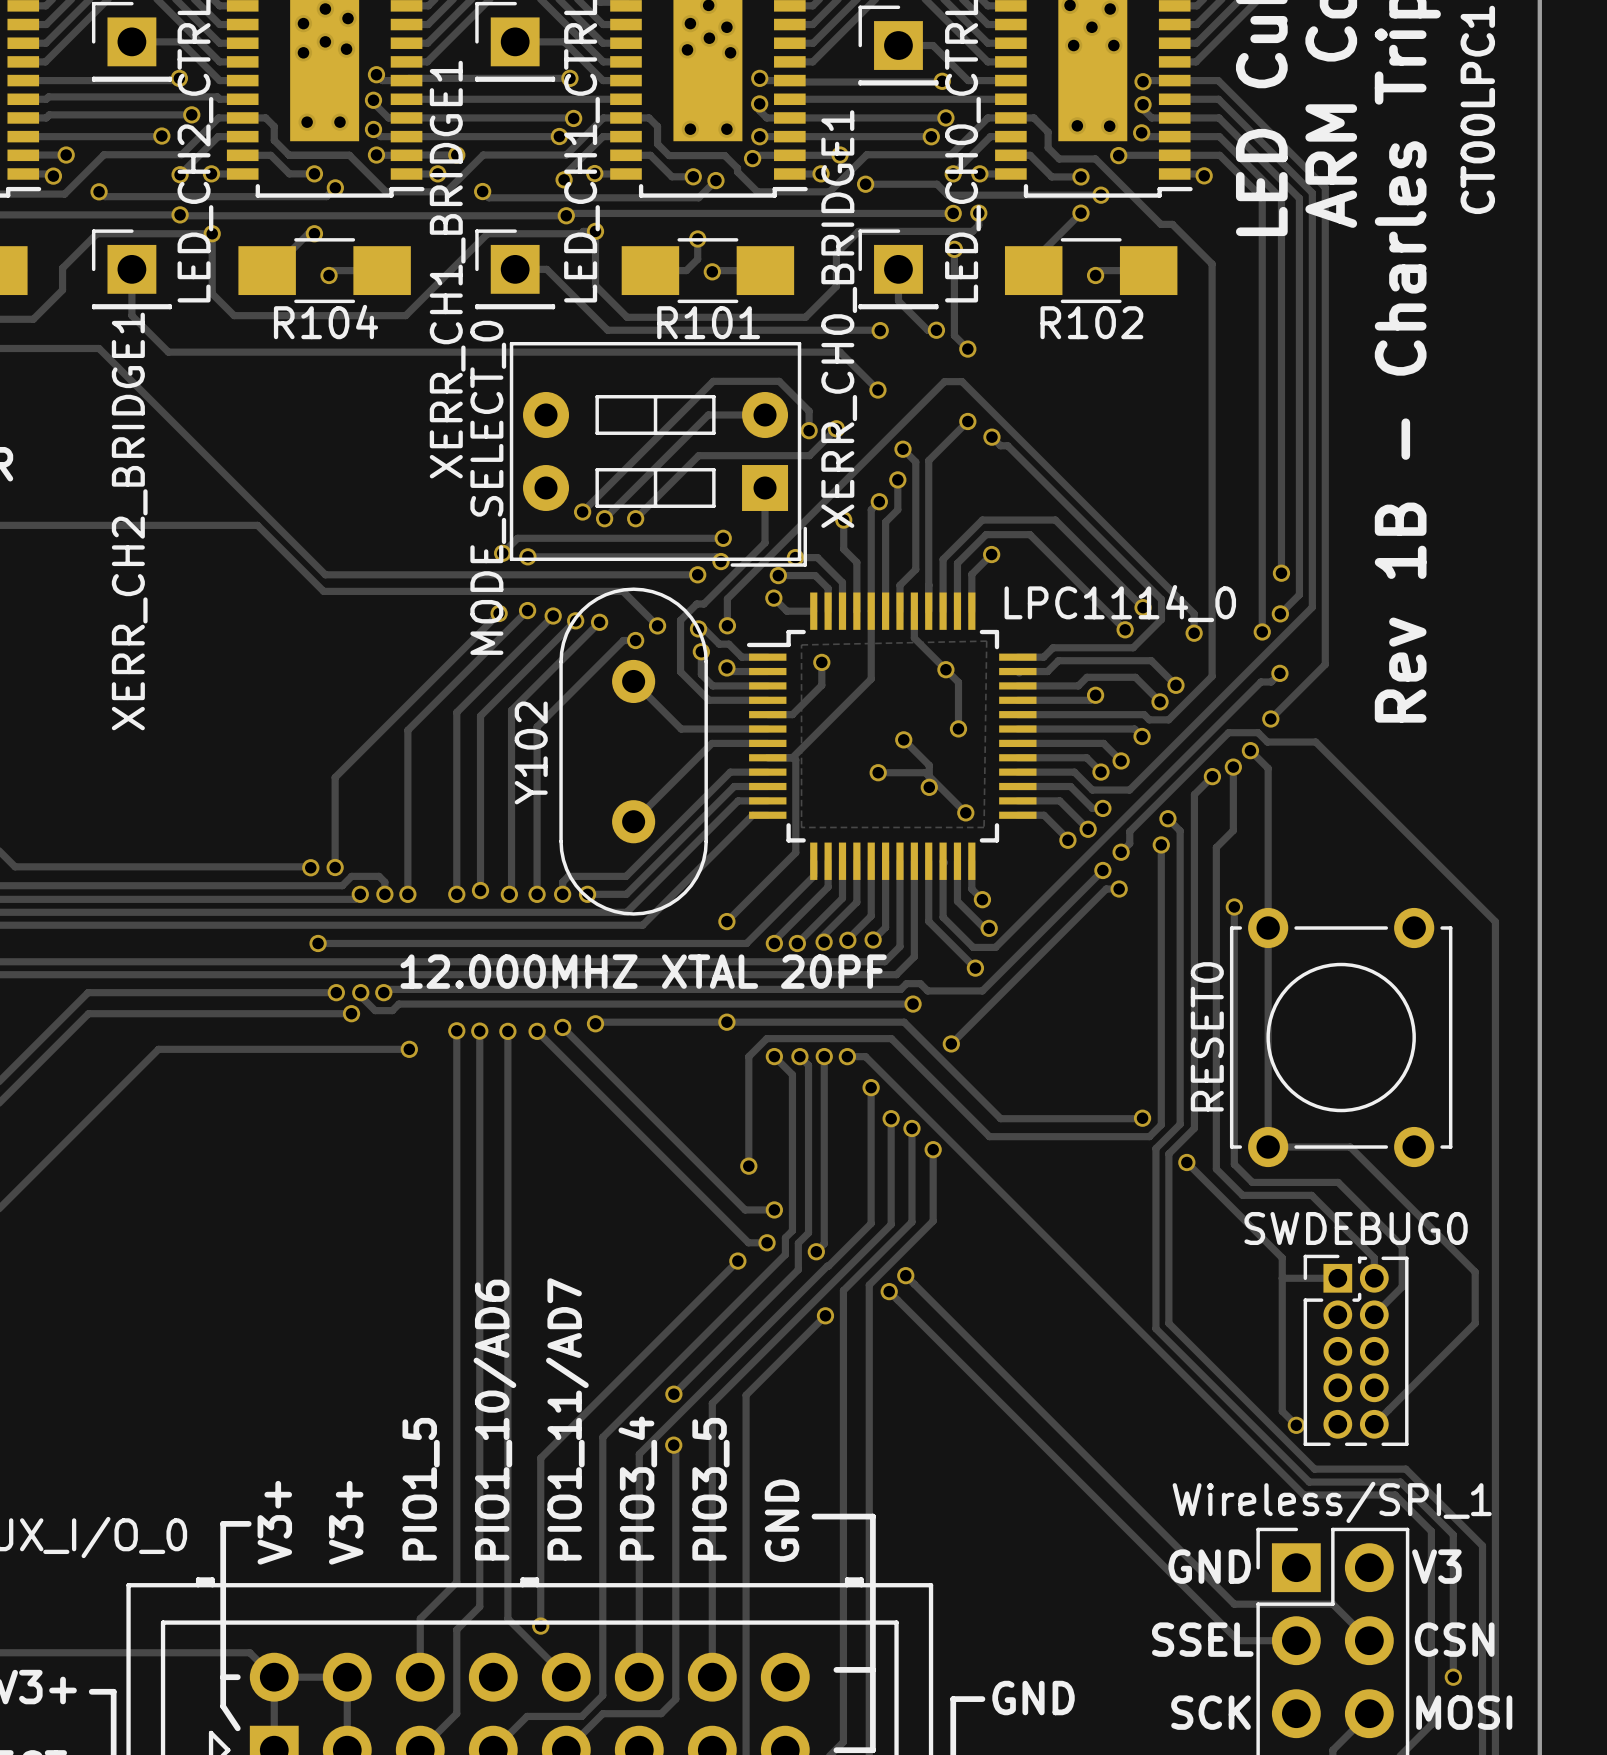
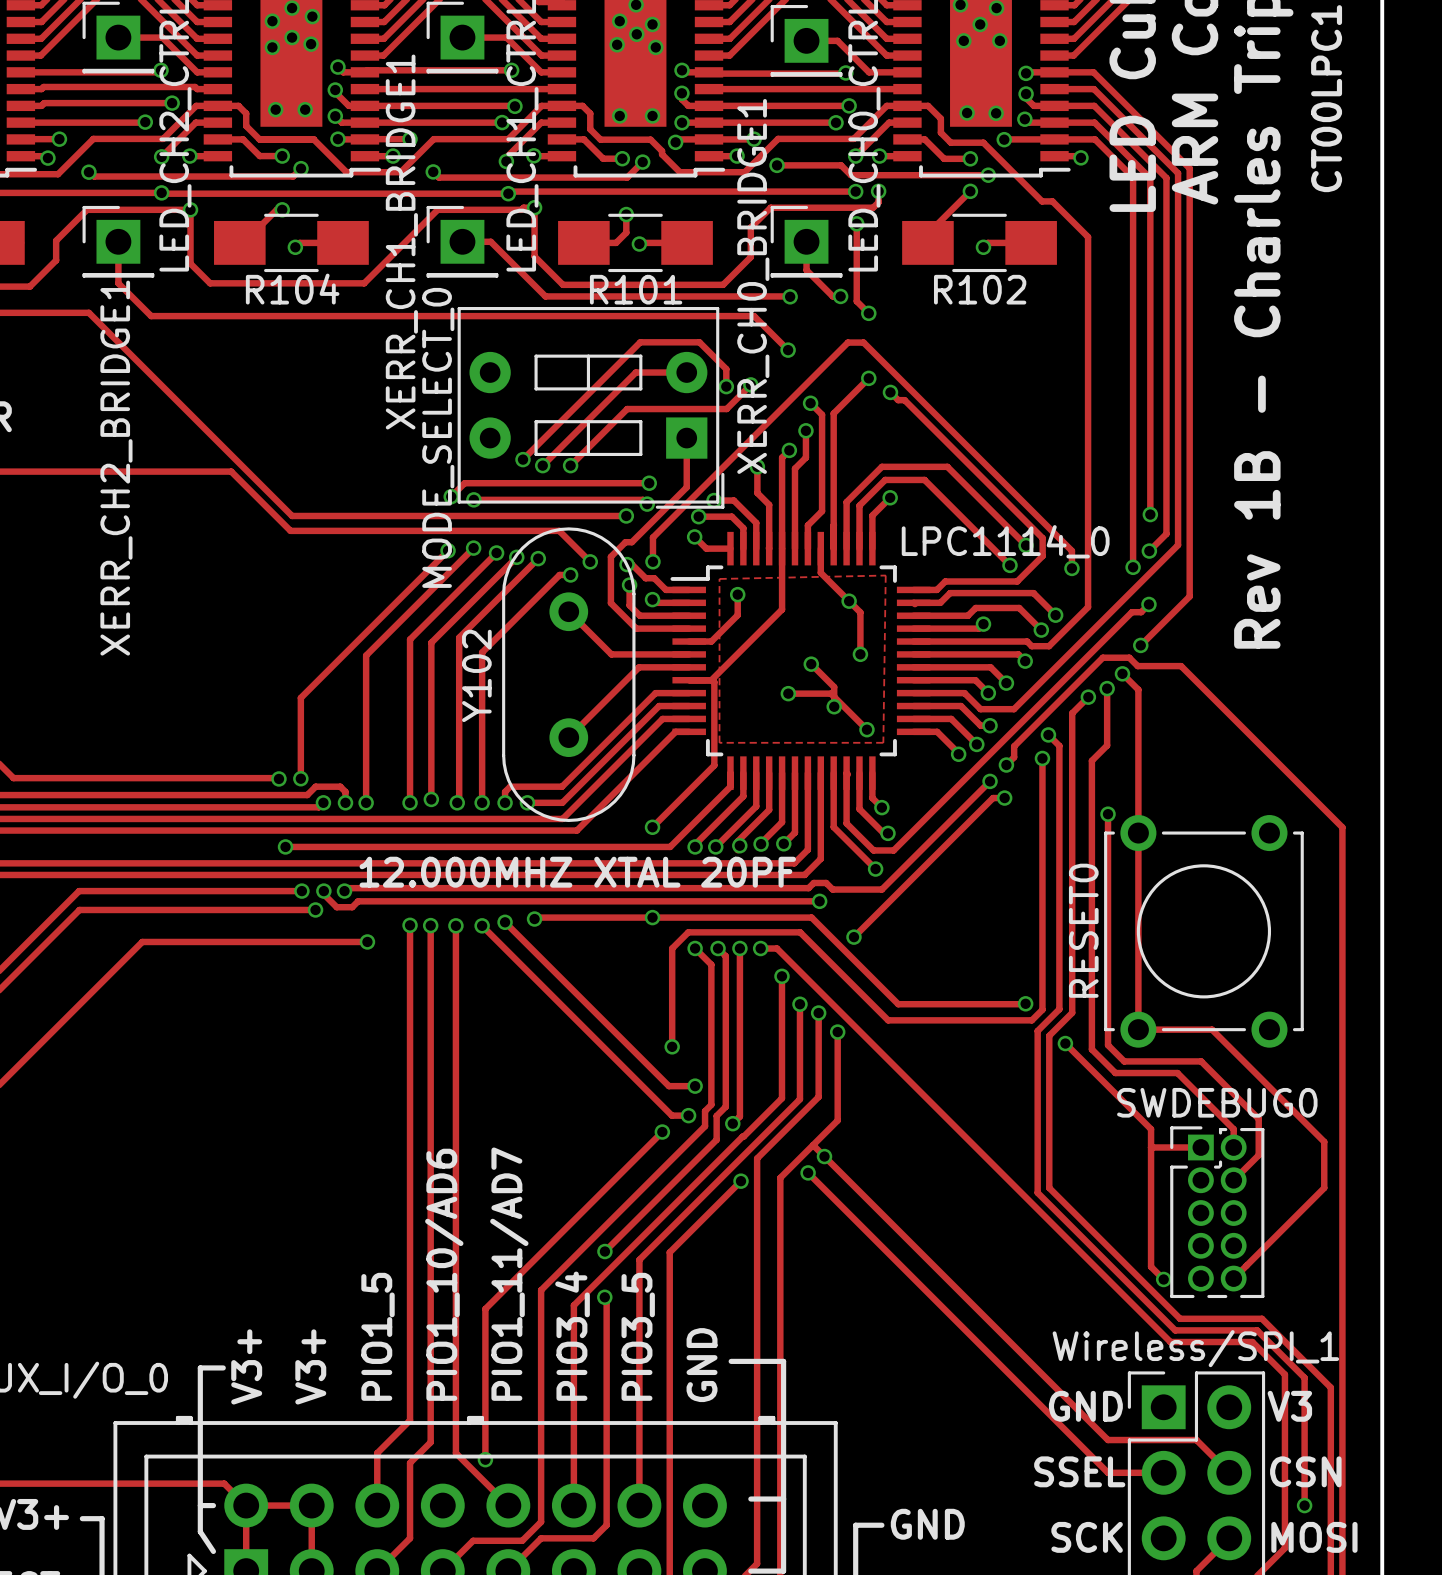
track: (933, 1221) (869, 1284) (869, 1312) -> (837, 1096) (837, 1120) (780, 1177)
via position: (905, 1275) -> (824, 1156)
track: (889, 1291) (1238, 1640) -> (808, 1172) (1107, 1472) (1111, 1472)
via position: (889, 1291) -> (808, 1172)

